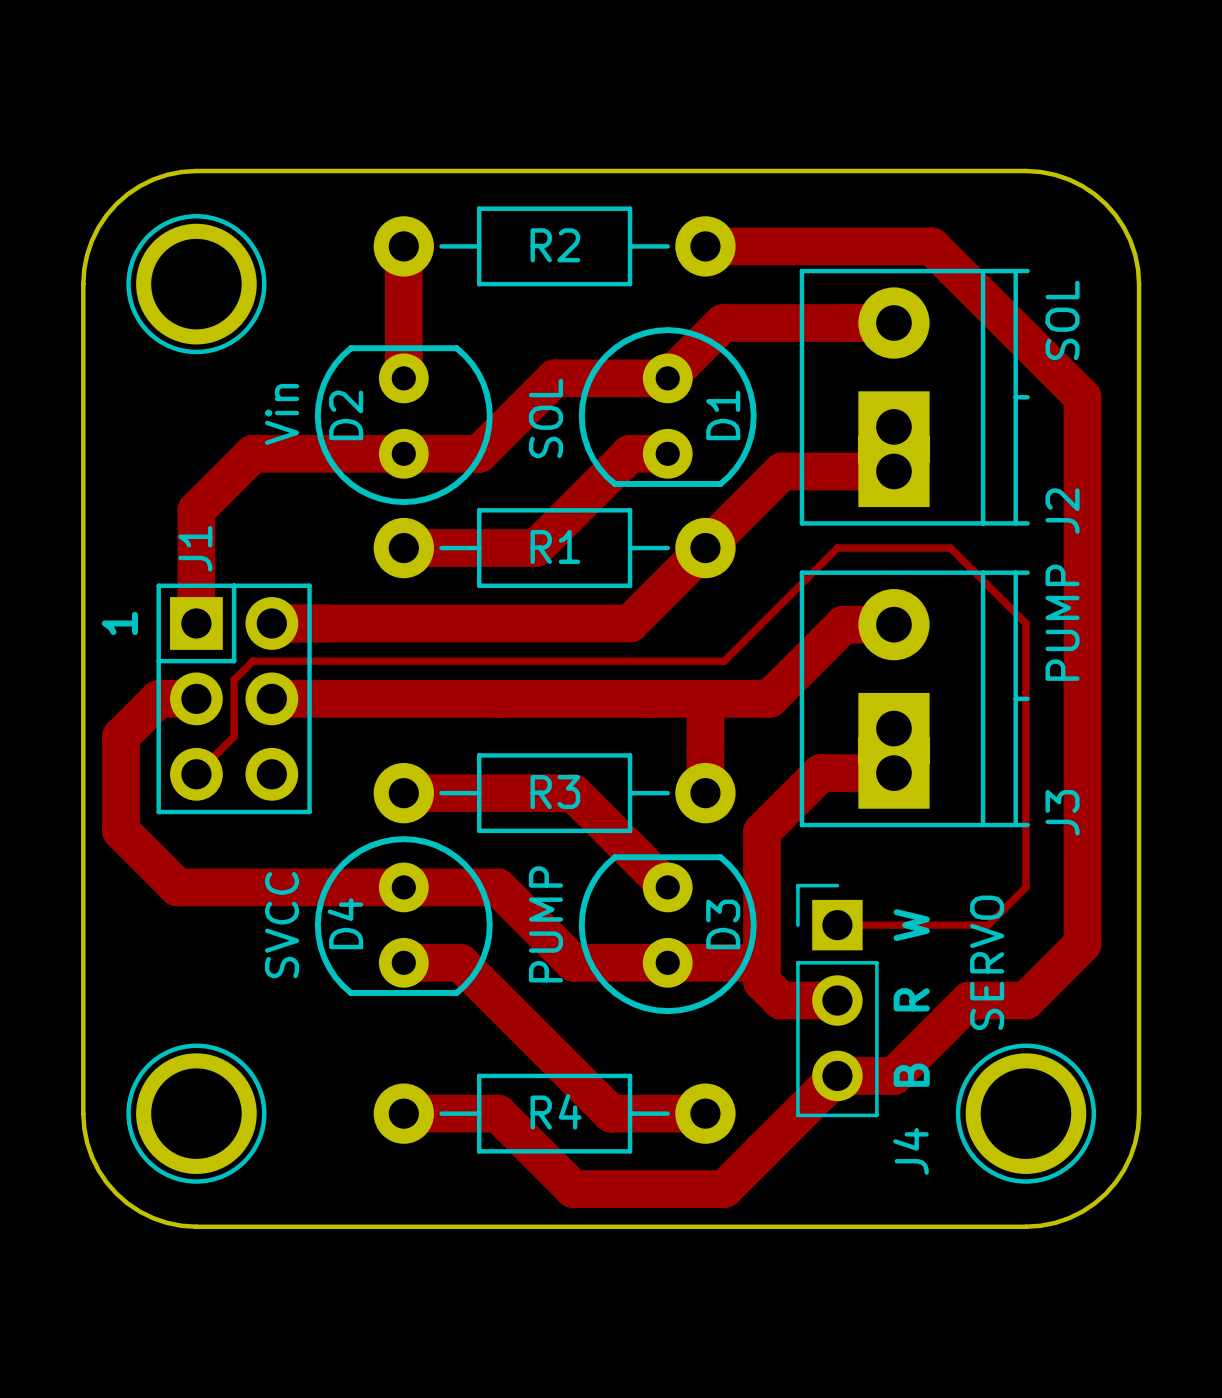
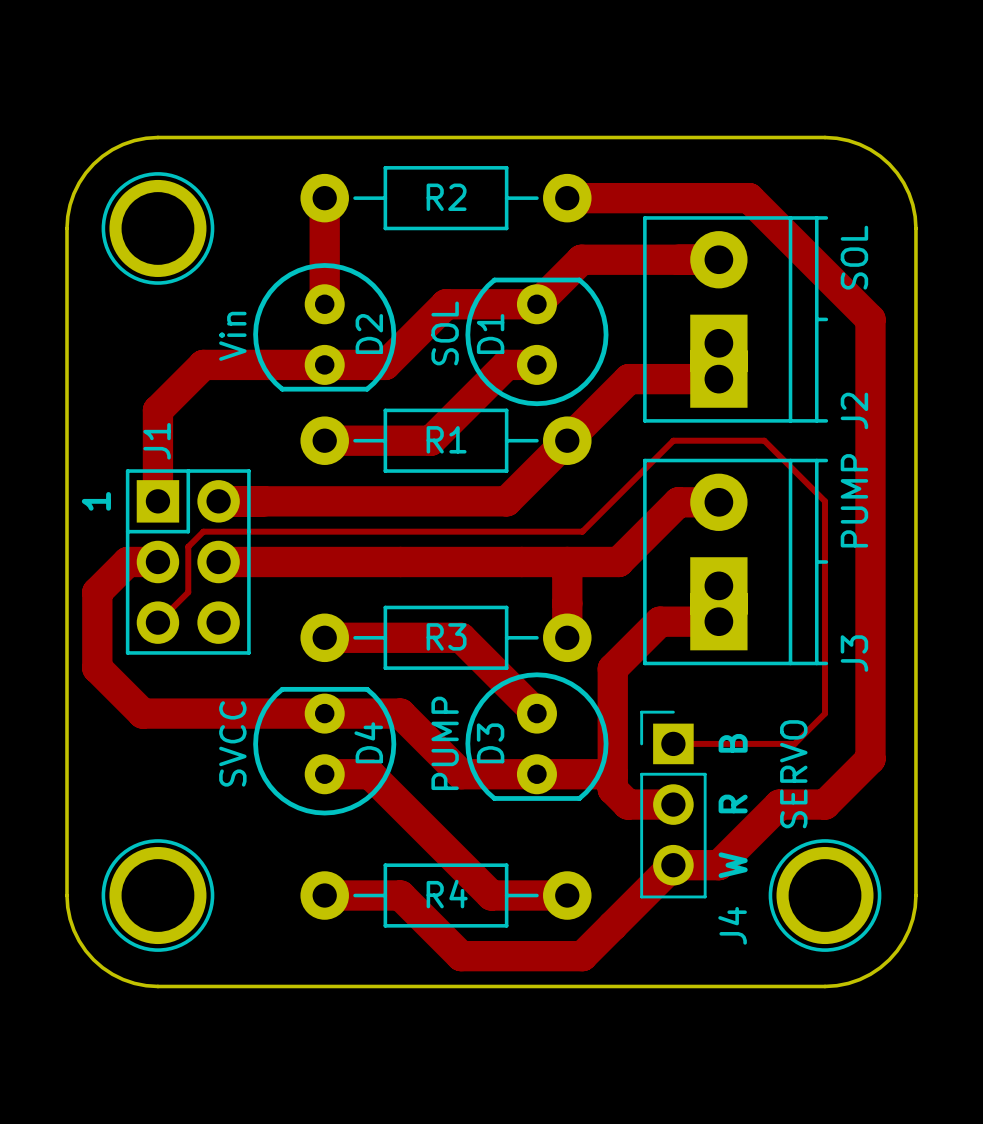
D1 rotation: 0° (667, 407) -> 180° (536, 341)
D2 rotation: 0° (403, 425) -> 180° (324, 327)
D4 rotation: 0° (403, 916) -> 180° (324, 751)
text: W (911, 925) -> B (733, 743)
D3 rotation: 0° (667, 934) -> 180° (536, 736)
text: B (911, 1075) -> W (733, 865)

